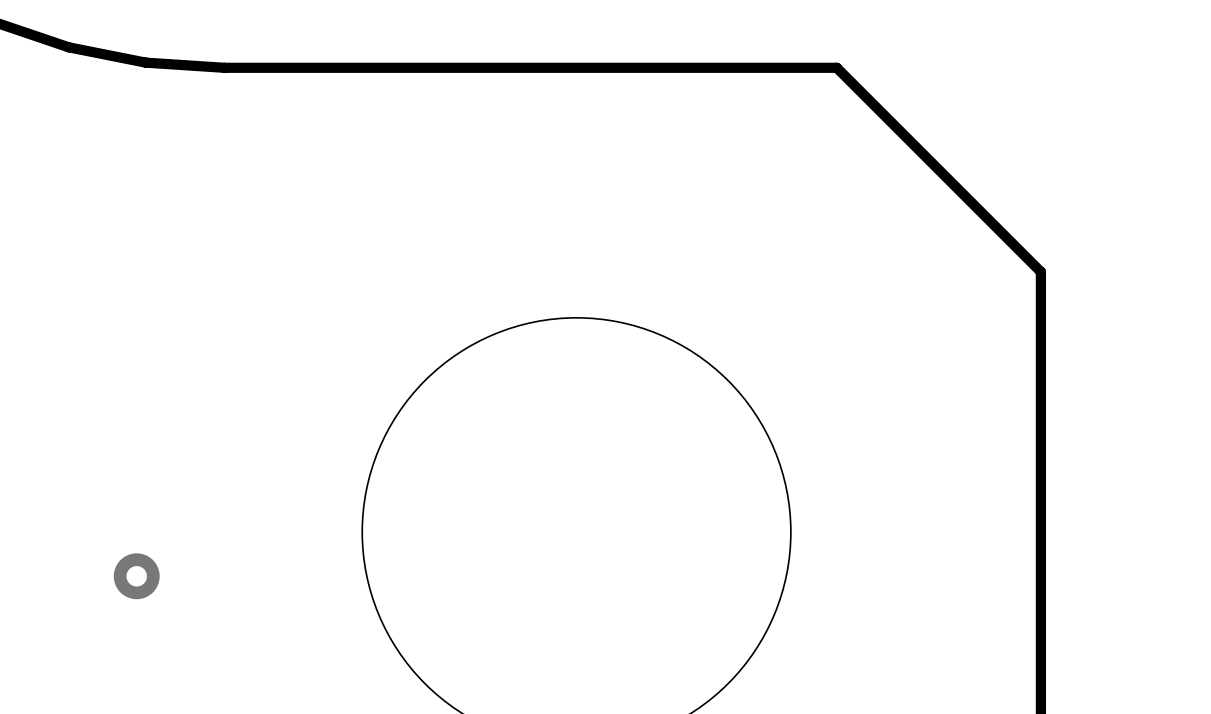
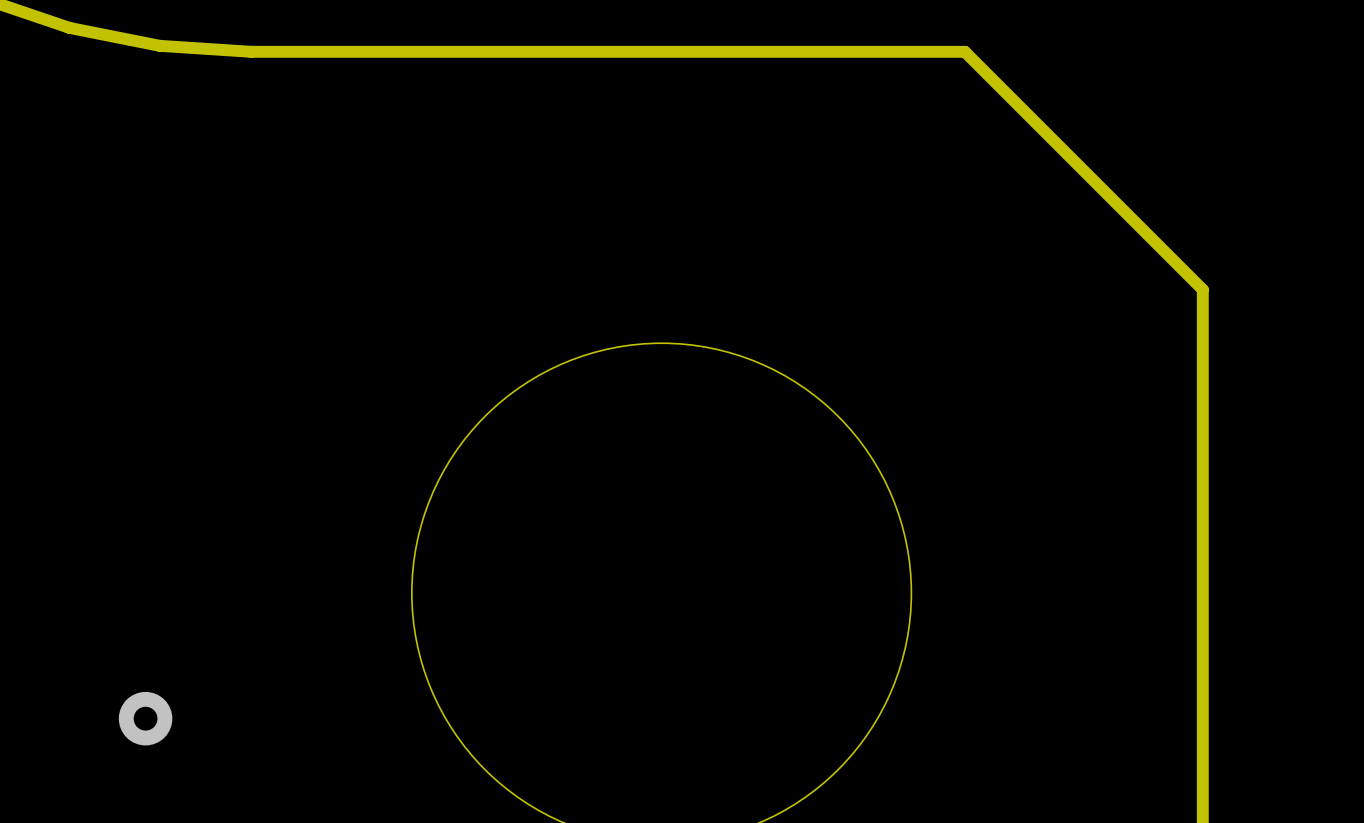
via position: (136, 576) -> (145, 718)

